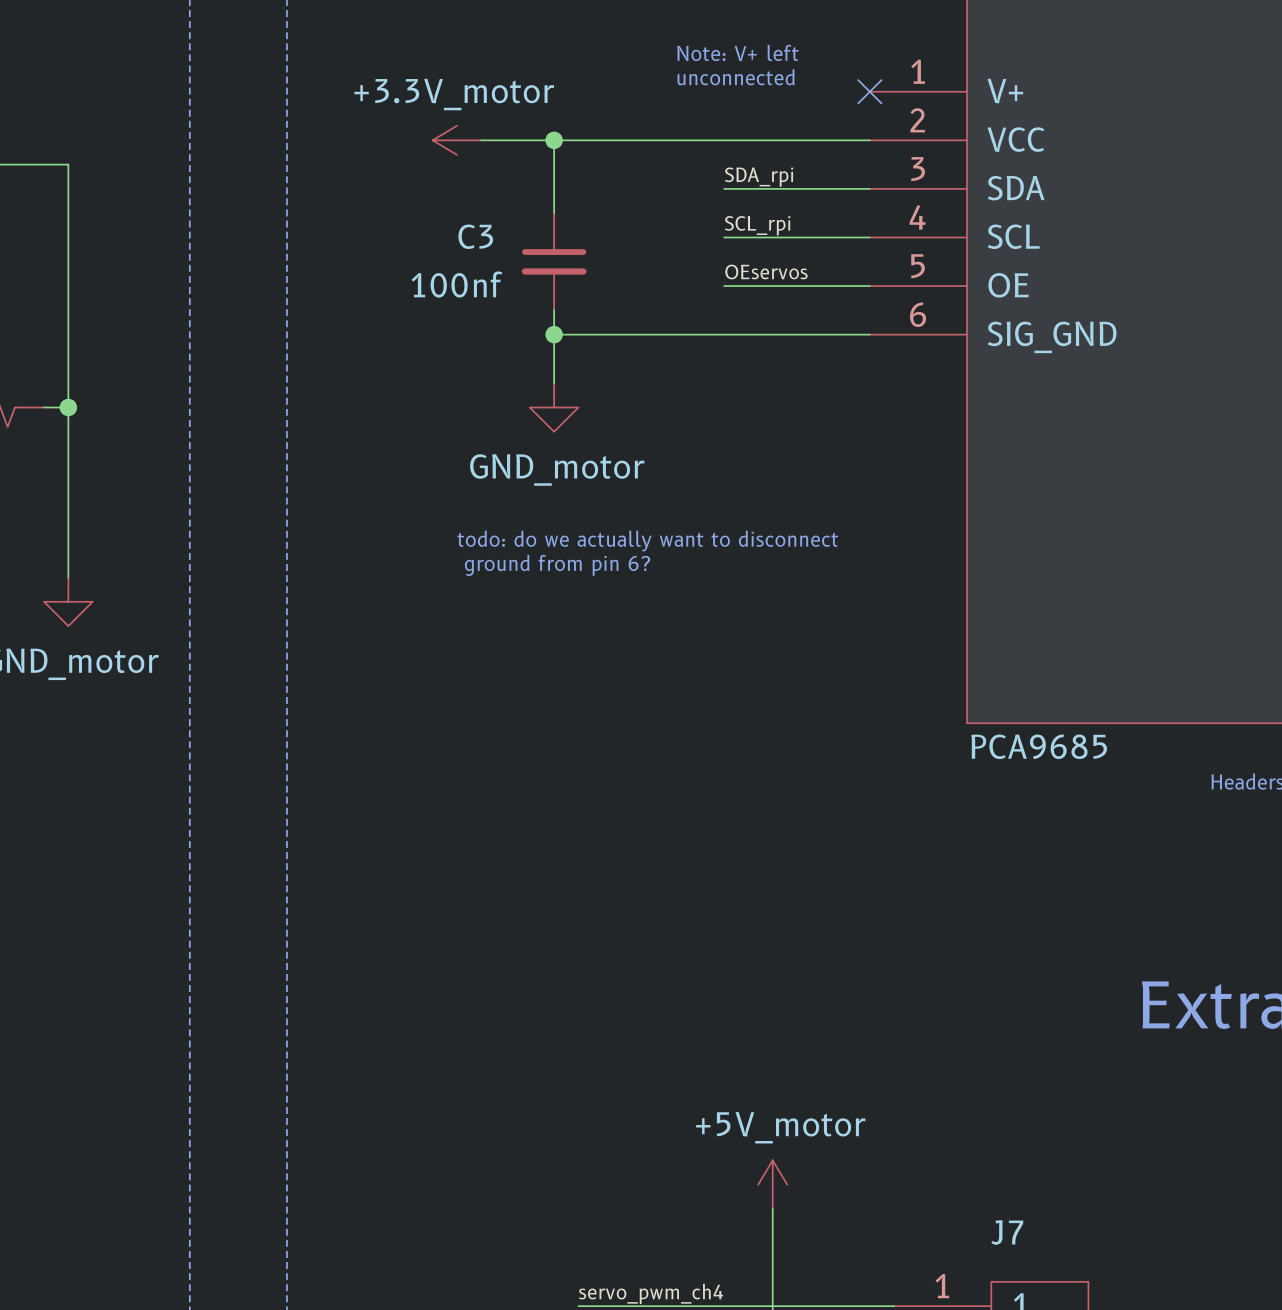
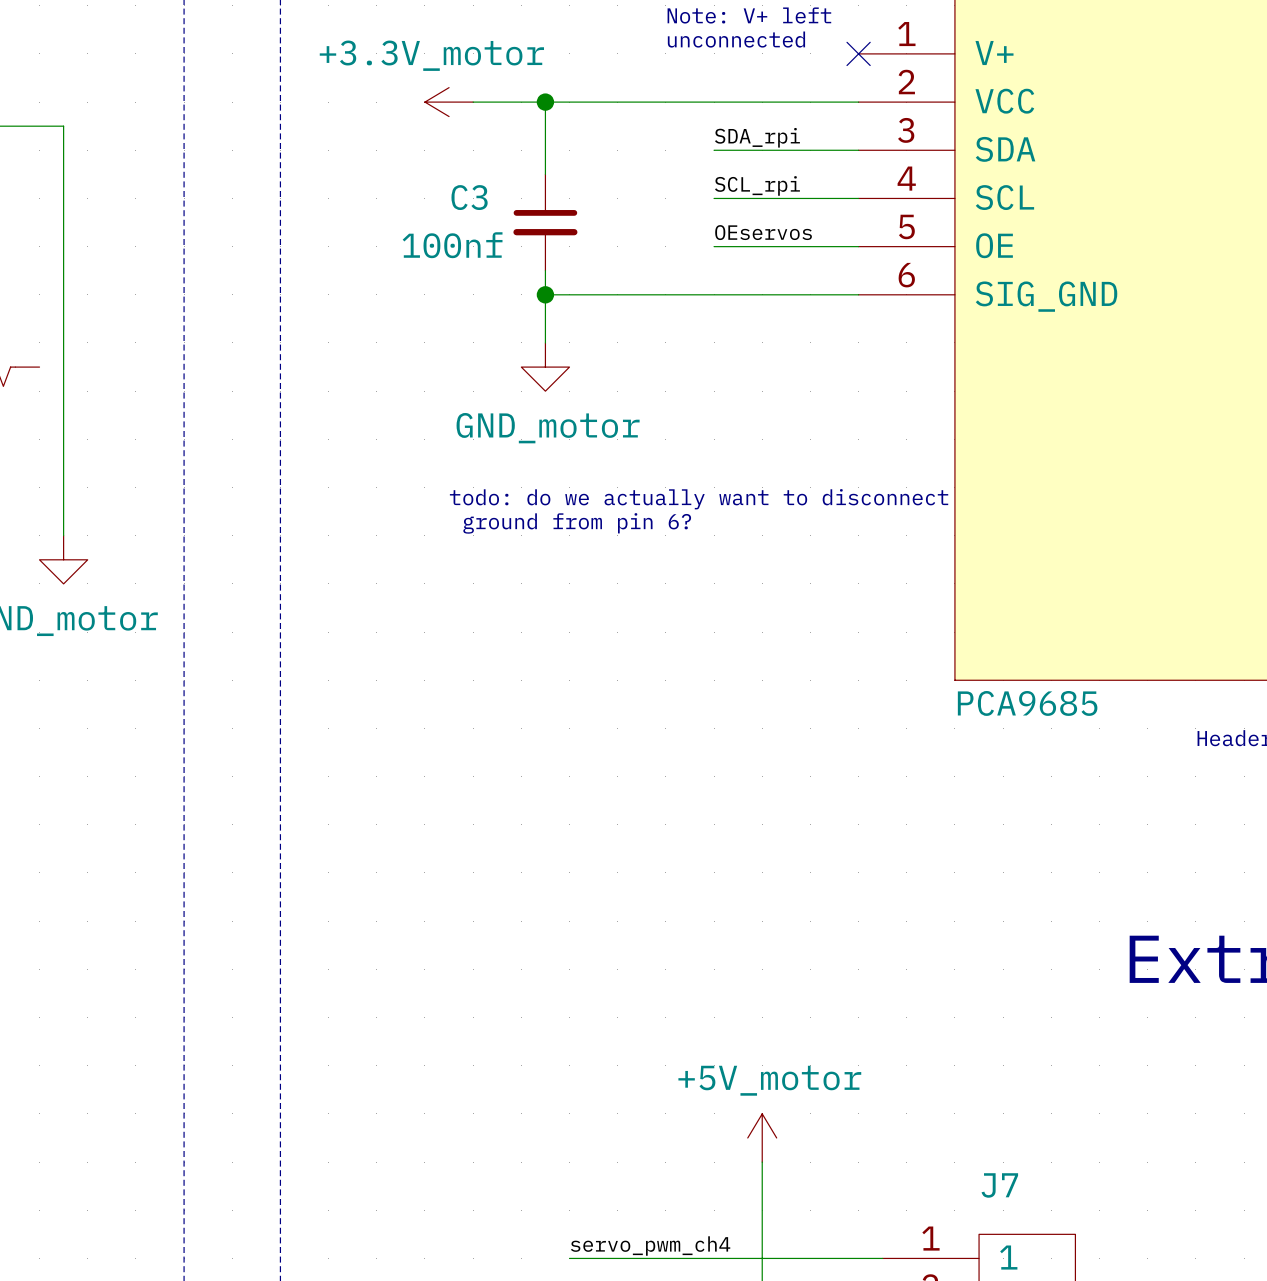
wire: (44, 407) (68, 407) -> none
junction: (68, 407) -> none

